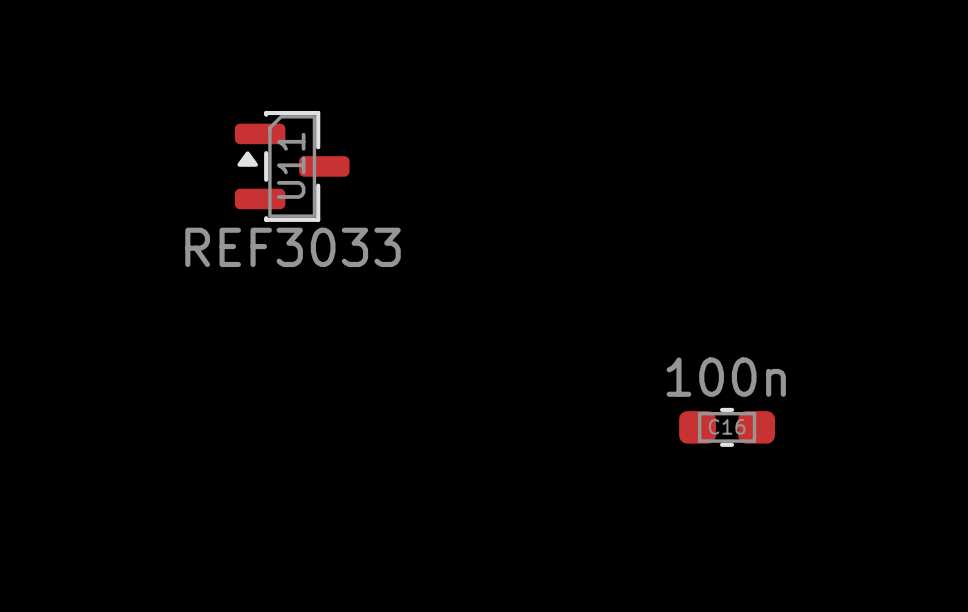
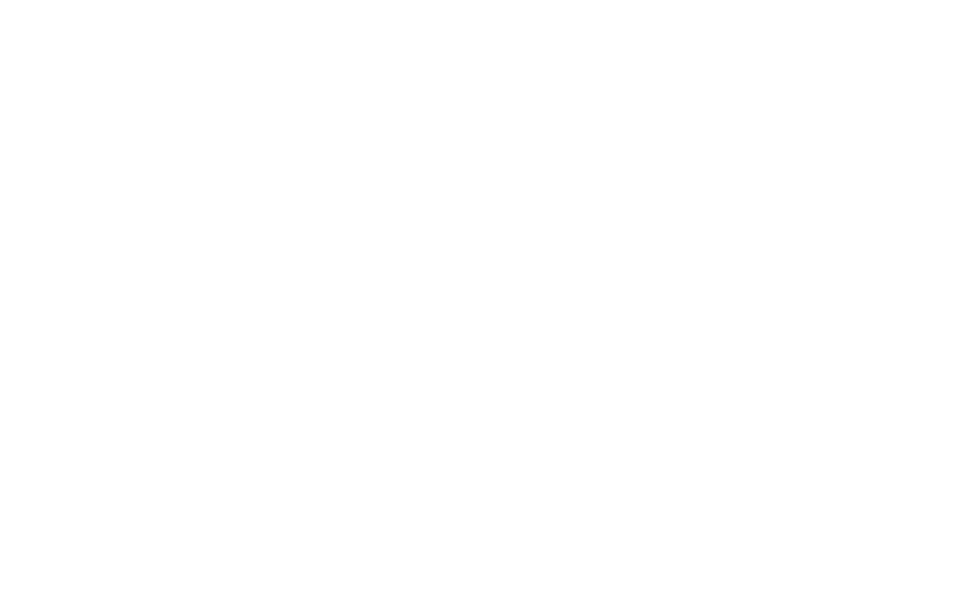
U11: REF3033 (292, 166) -> none
C16: 100n (727, 427) -> none

